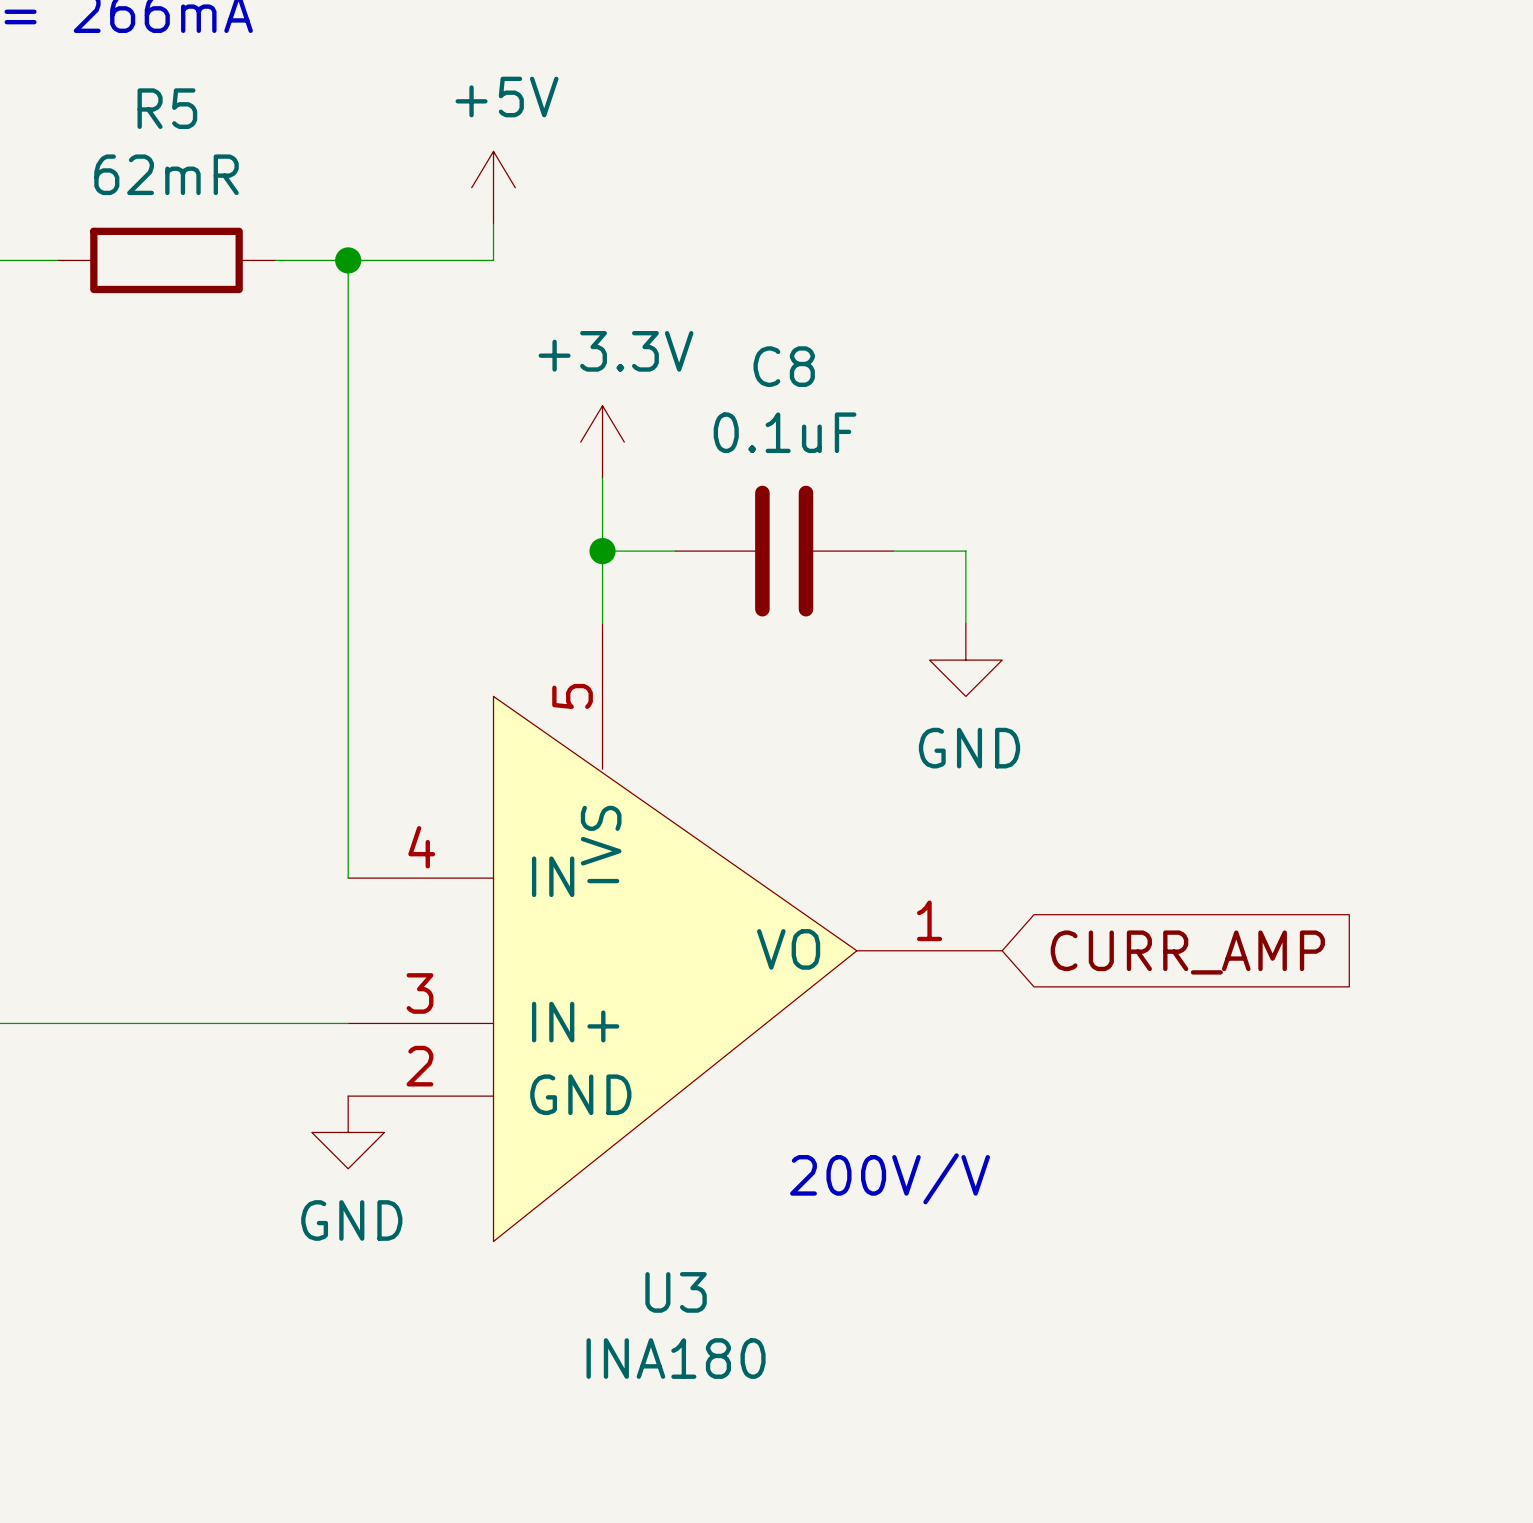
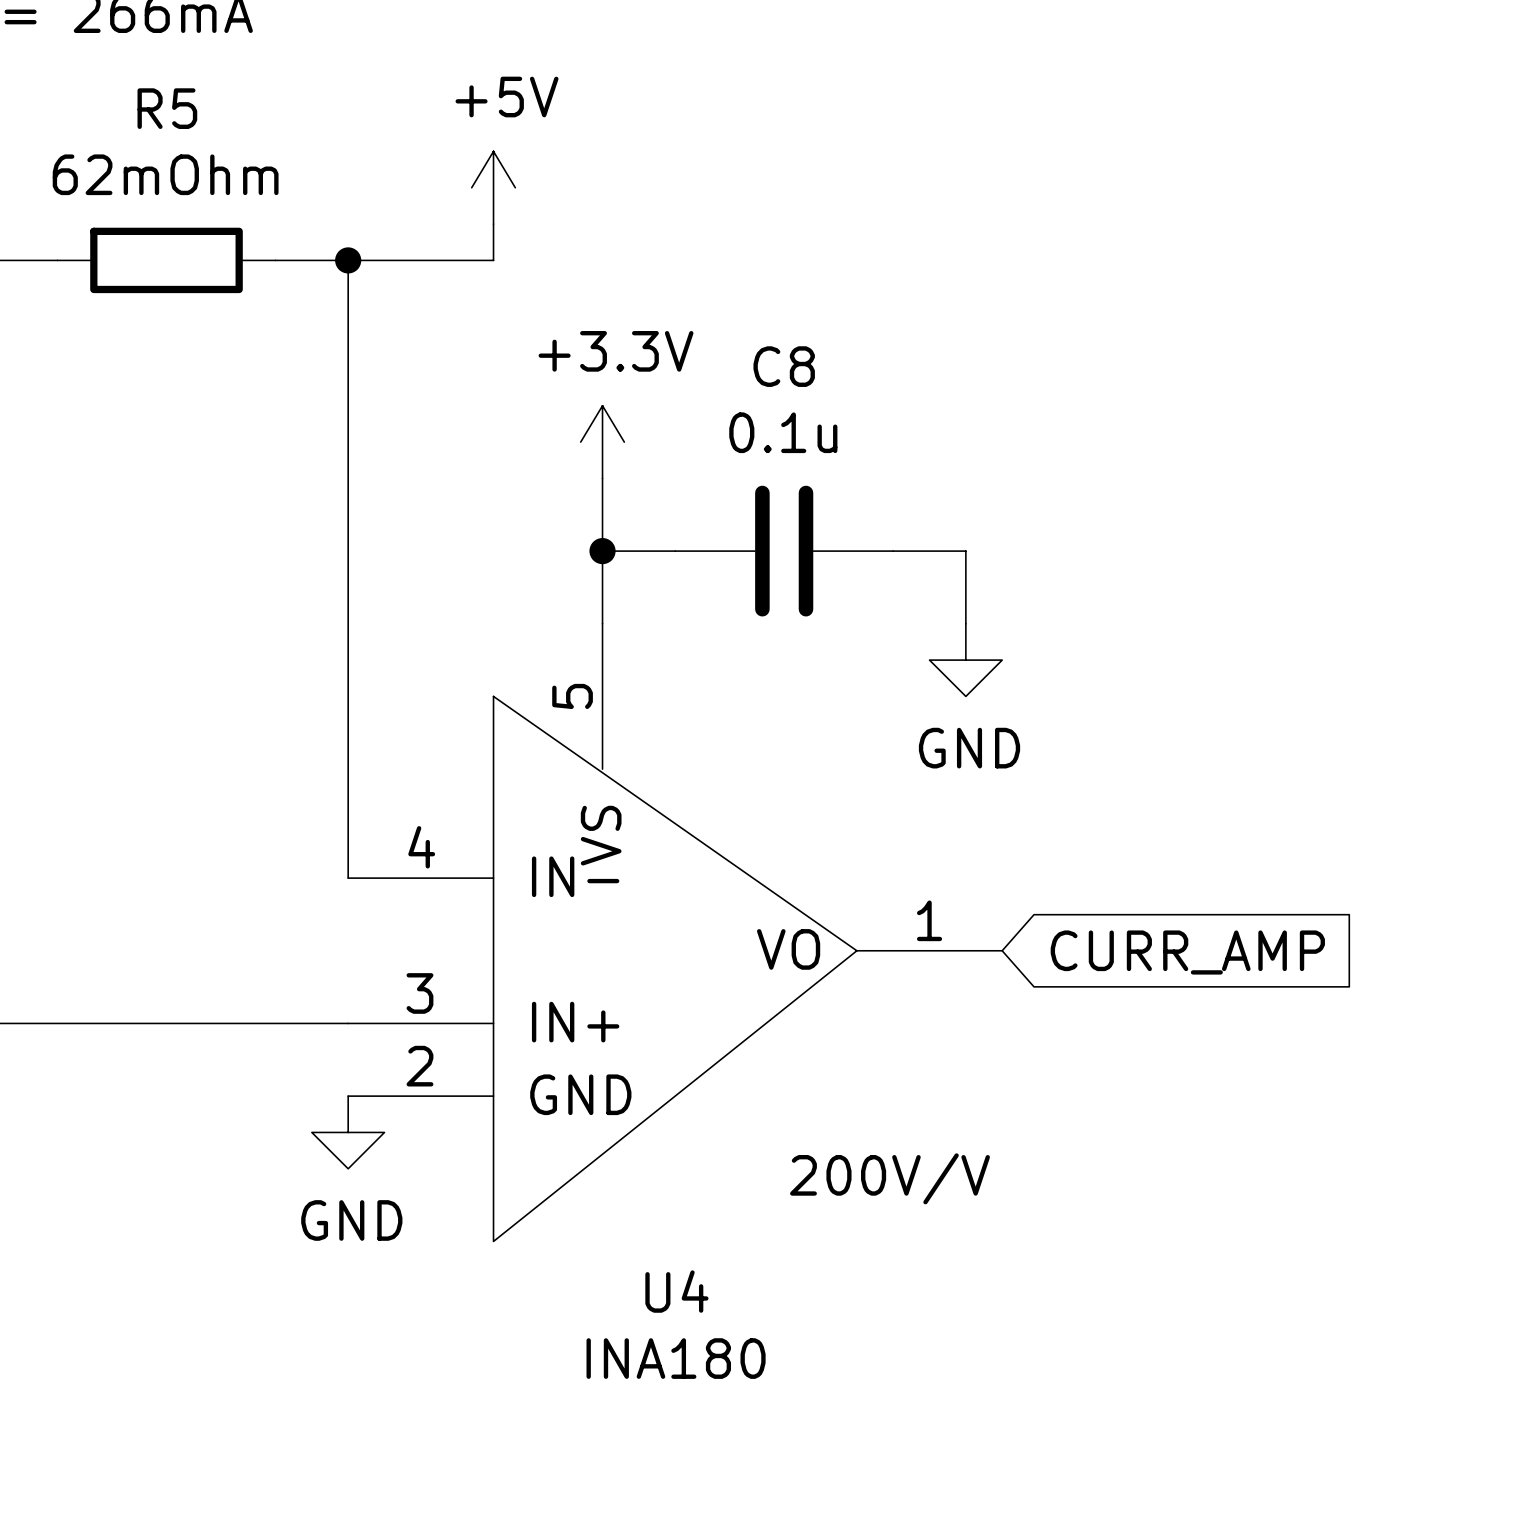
R5 value: 62mR (166, 174) -> 62mOhm (165, 174)
C8 value: 0.1uF (785, 432) -> 0.1u (783, 432)
U3 name: U3 (676, 1292) -> U4 (676, 1291)

